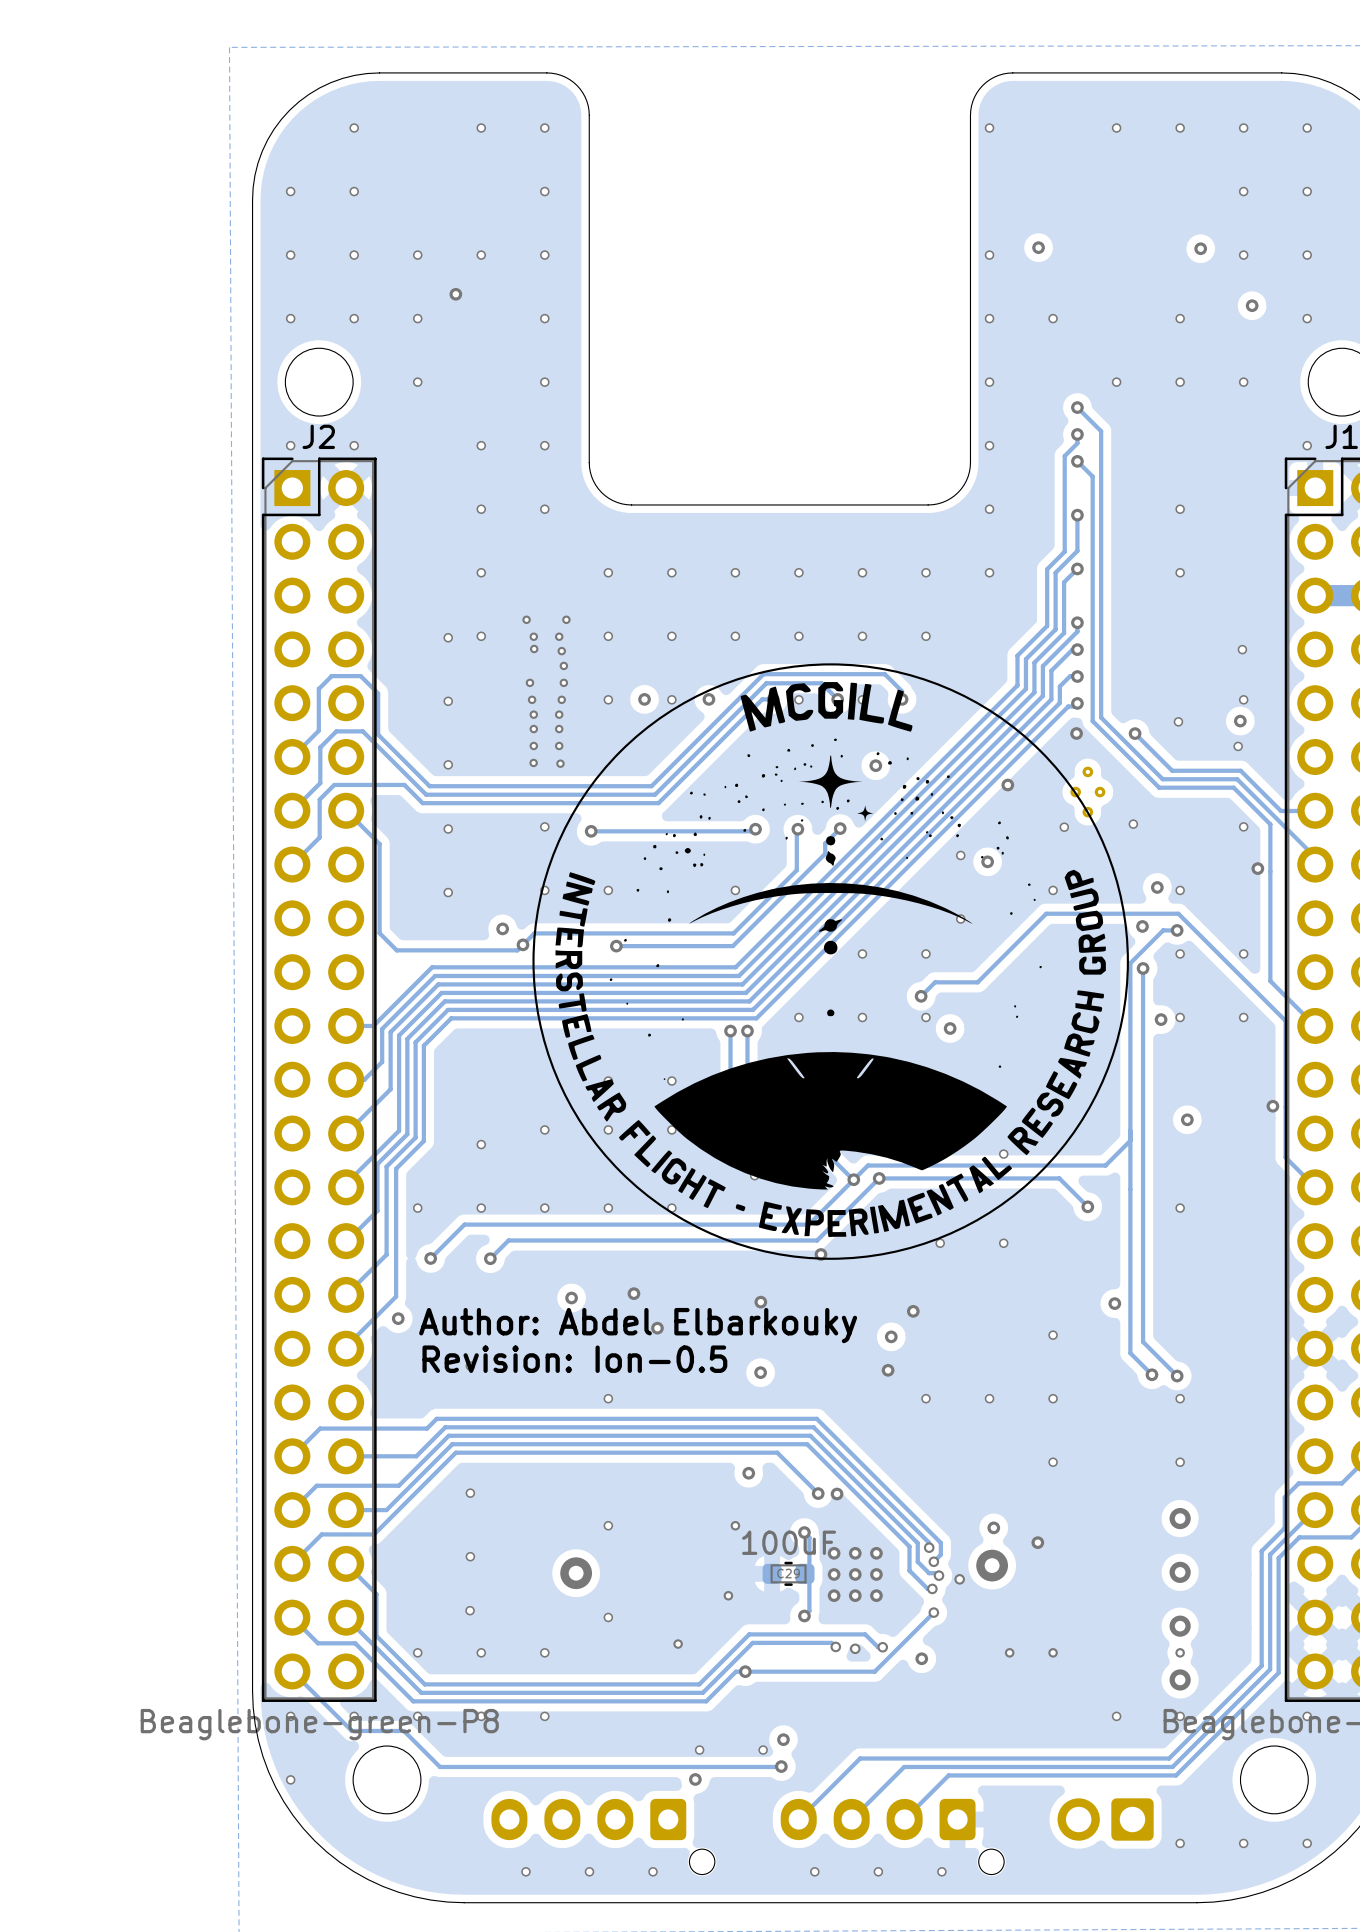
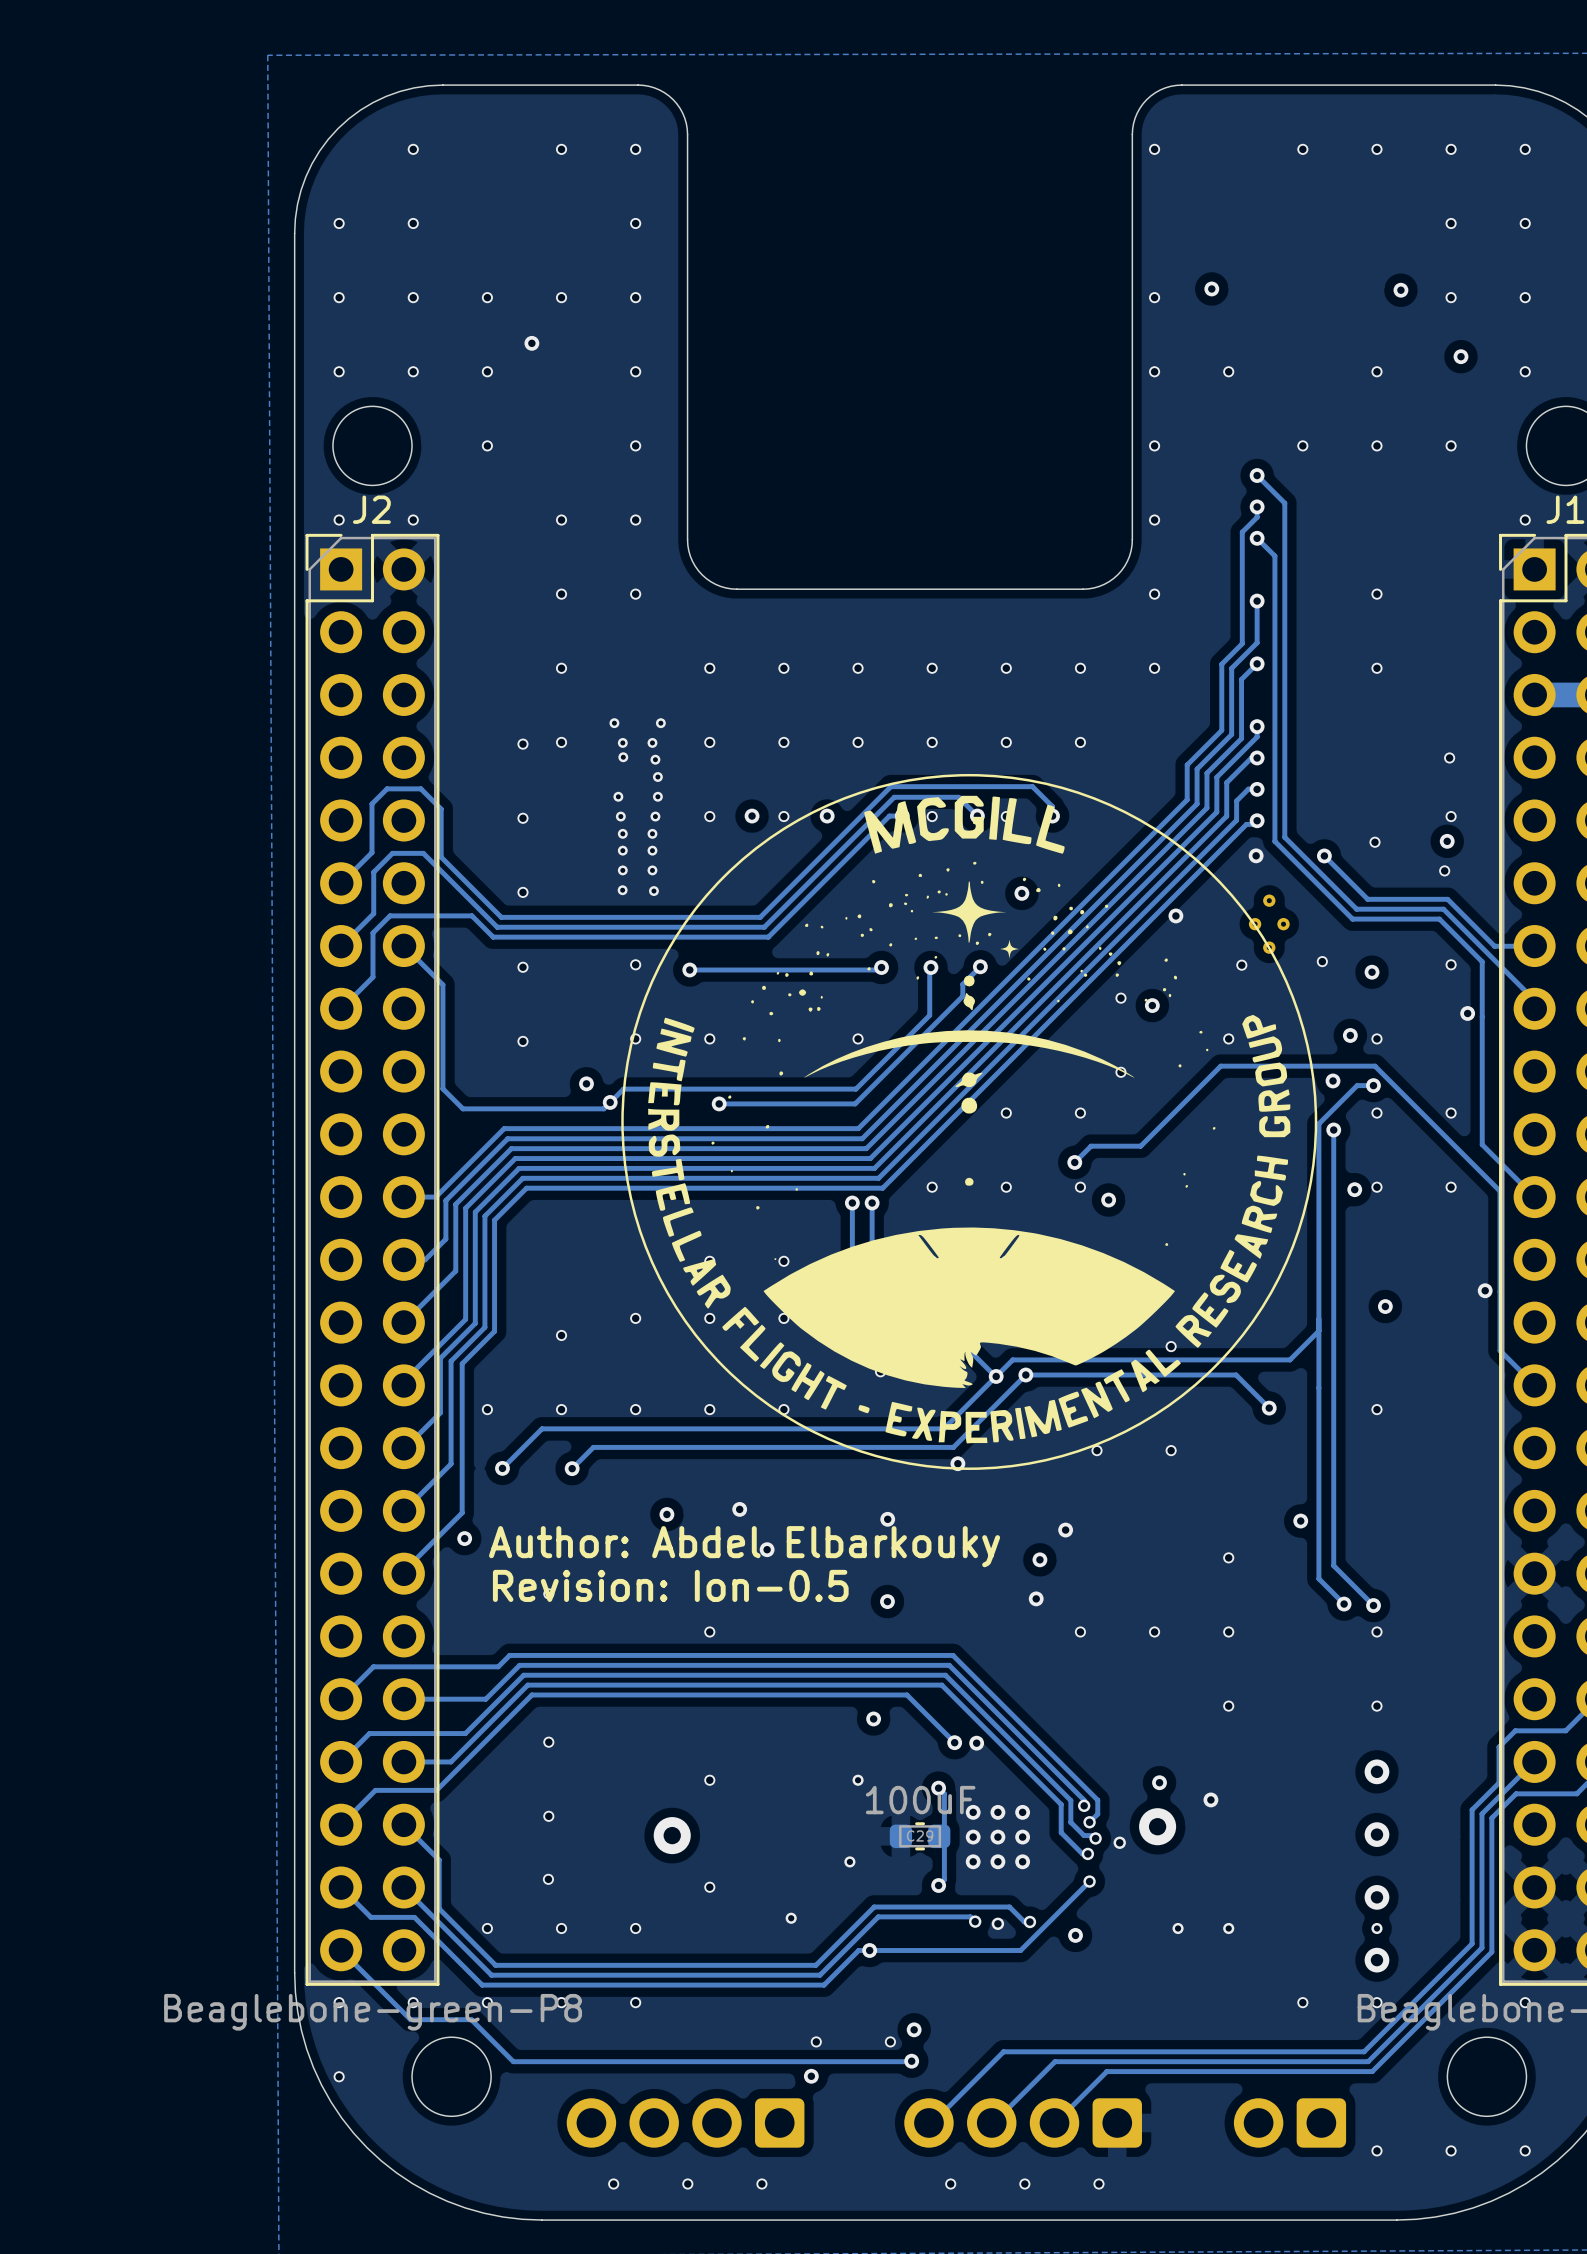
via: none -> (1372, 972)
part: none -> (685, 2122)
part: none -> (1023, 2122)
part: (603, 1836) -> none
part: (892, 1836) -> none

